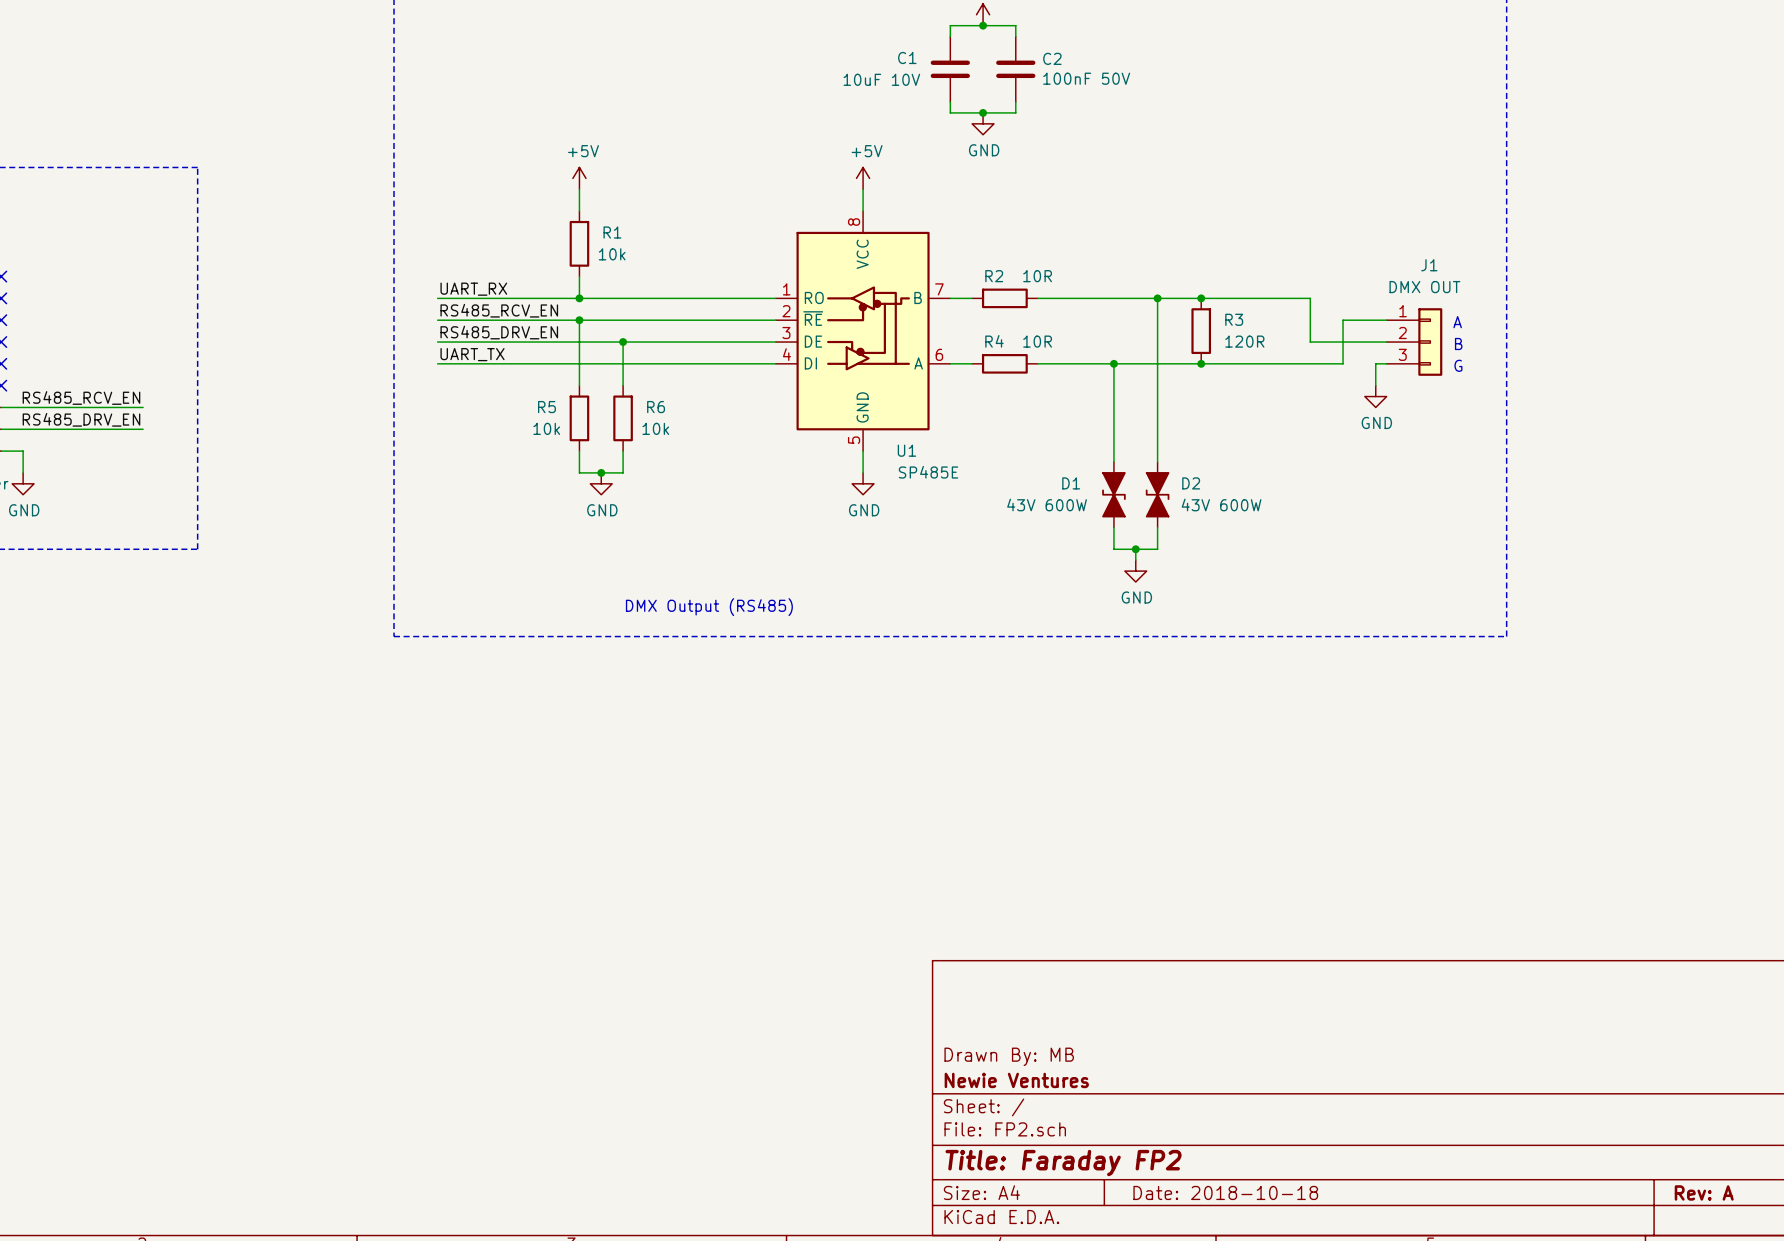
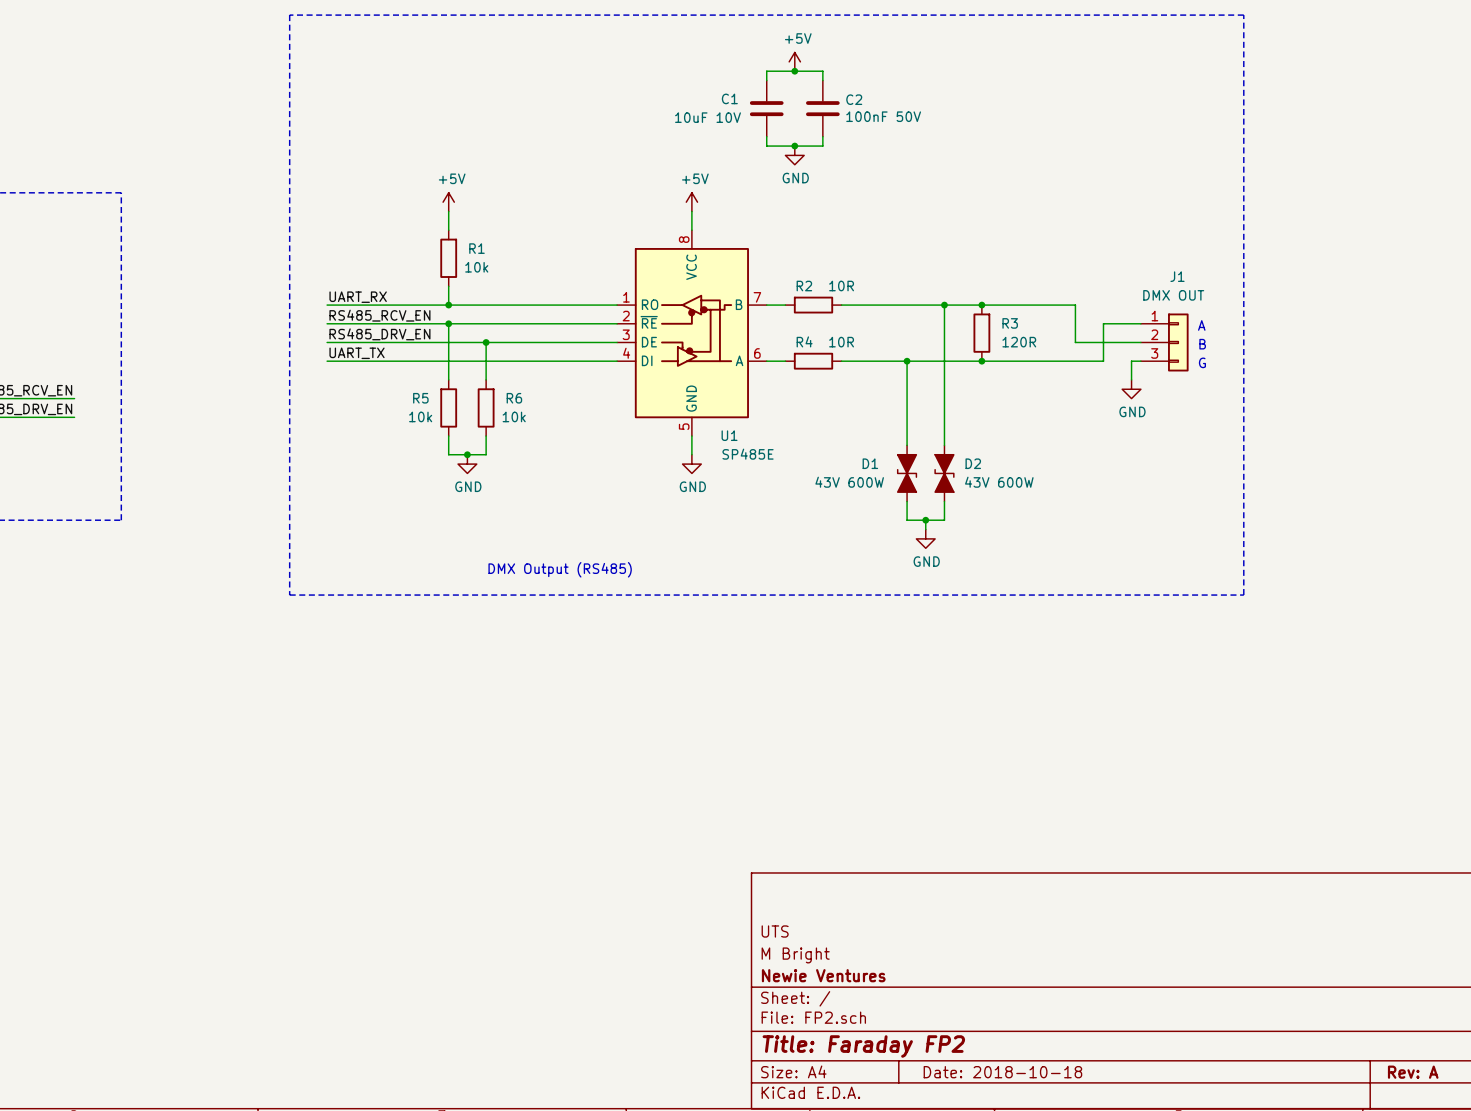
title block: none -> UTS (775, 931)
title block: Drawn By: MB (1009, 1056) -> M Bright (795, 955)

